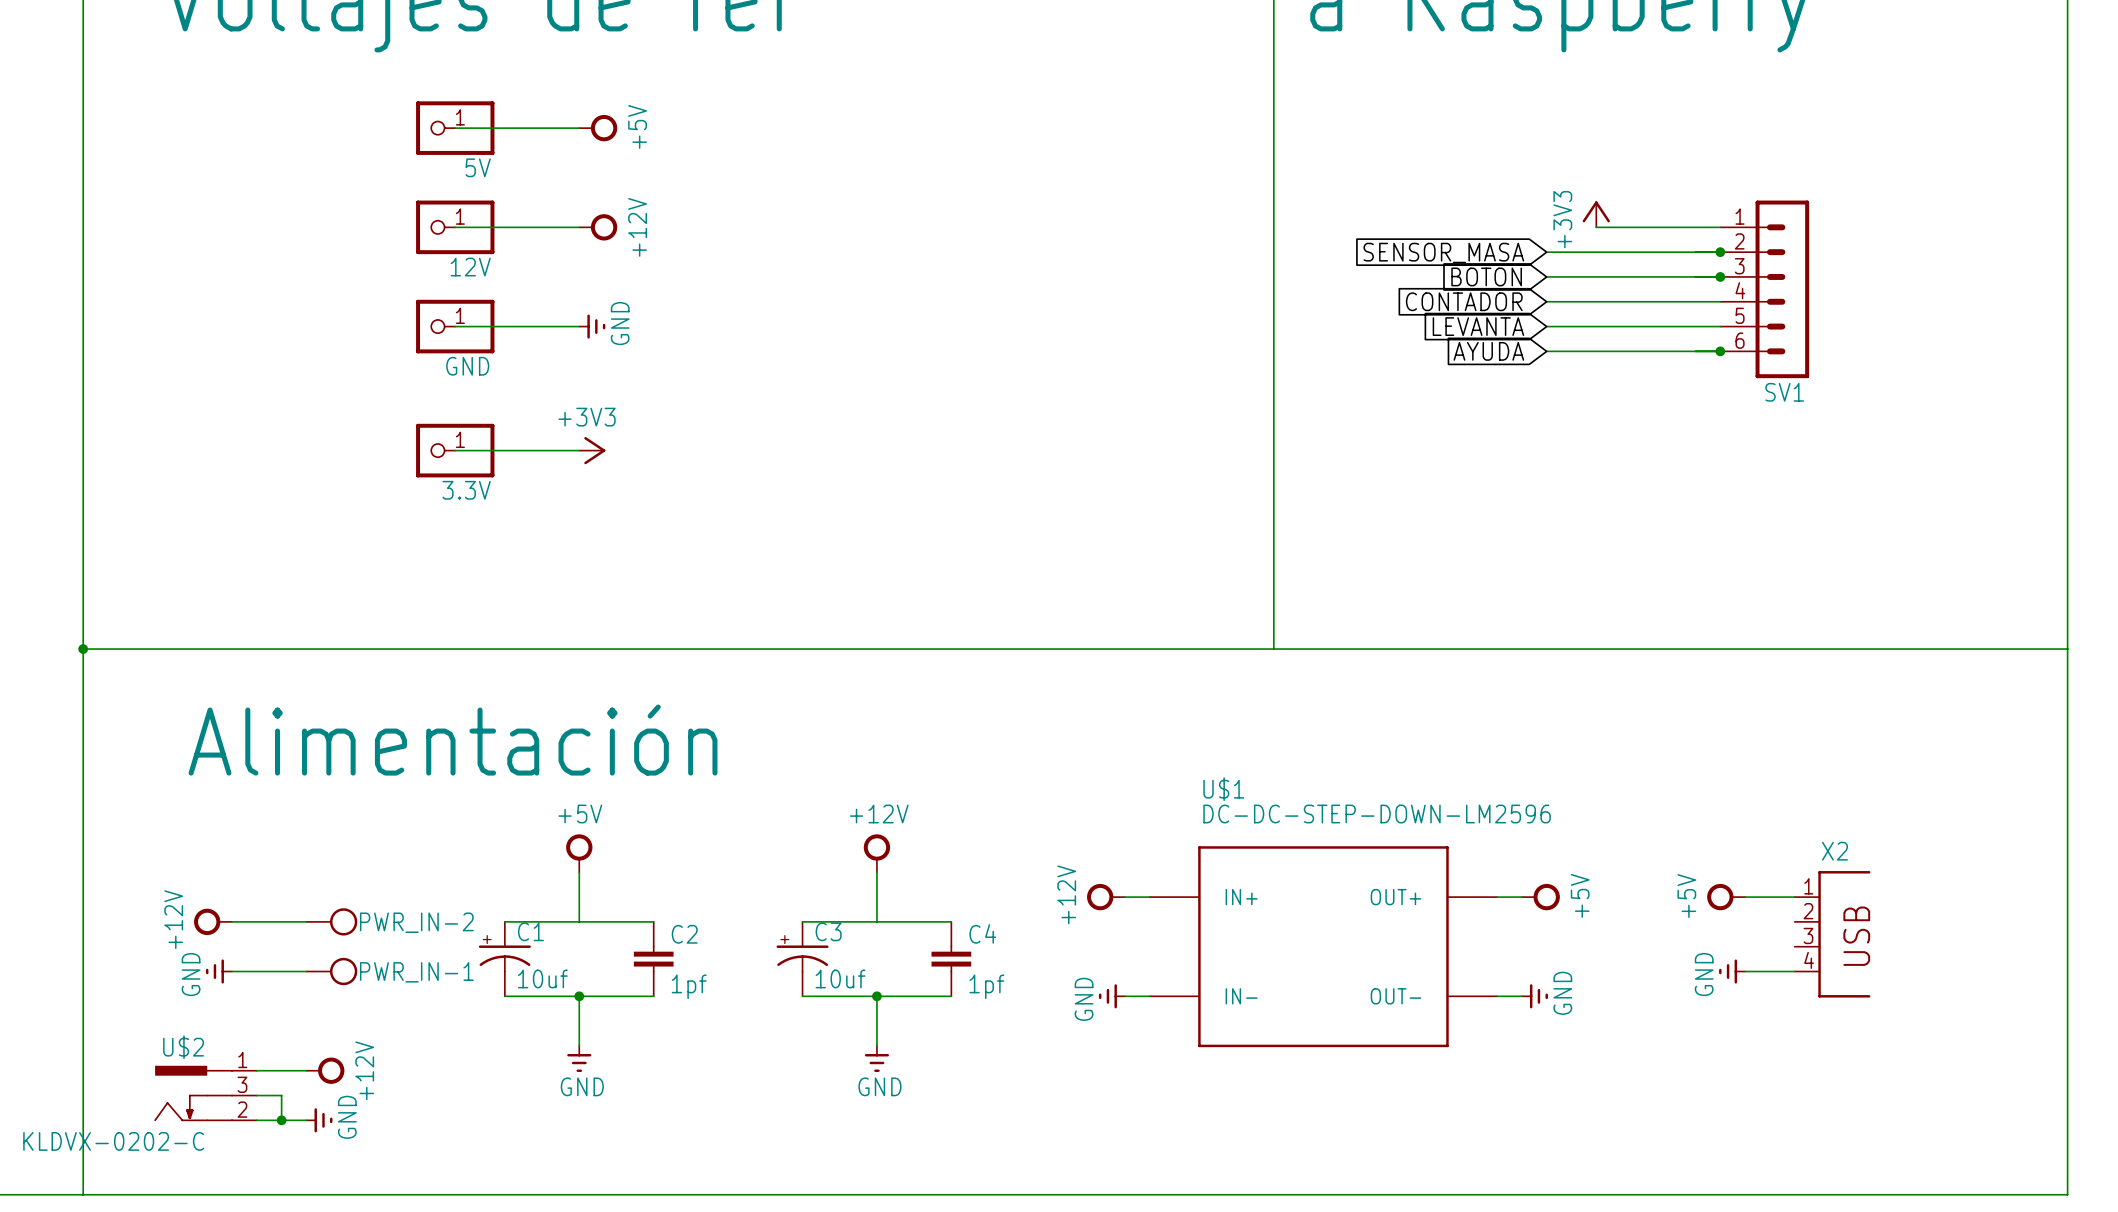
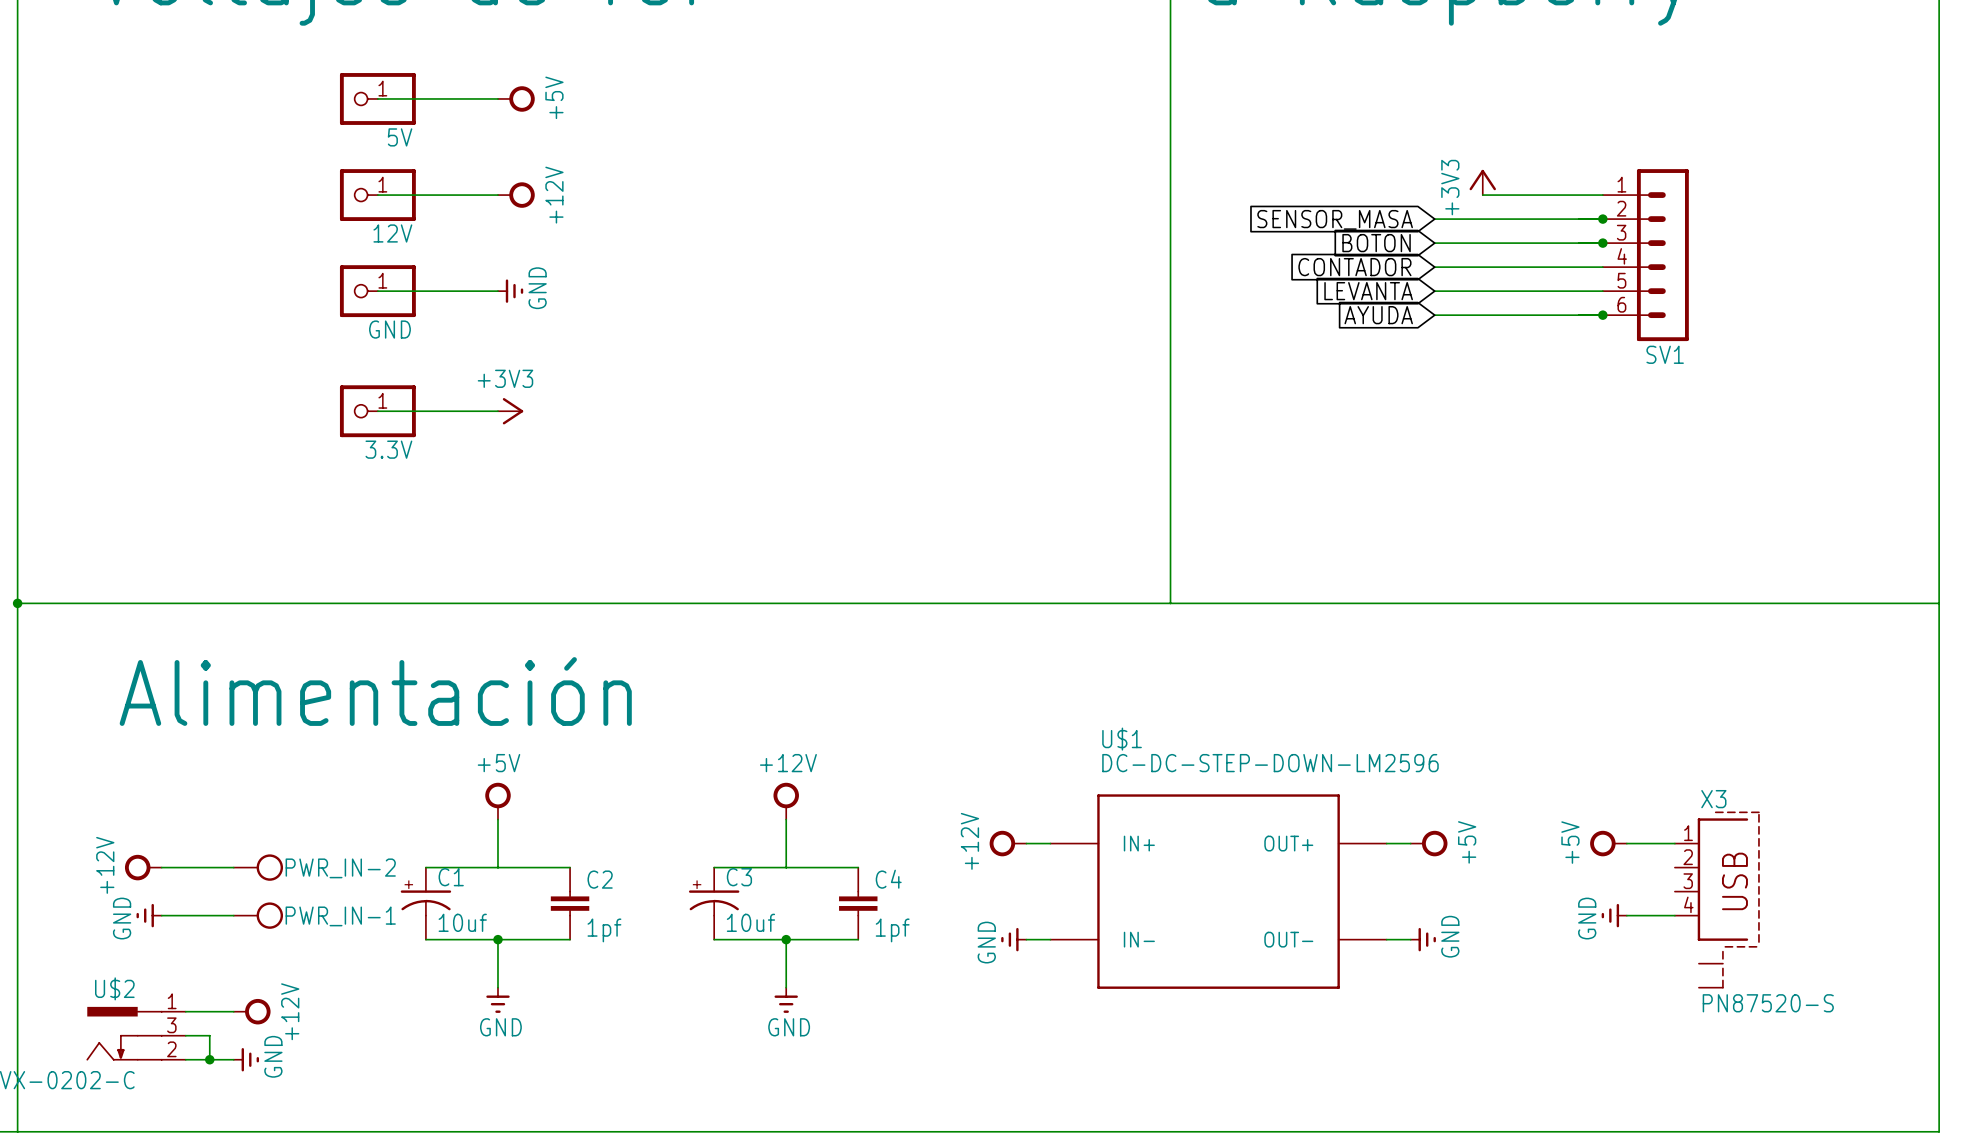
X2: (1832, 934) -> none
X3: none -> PN87520-S (1717, 900)

